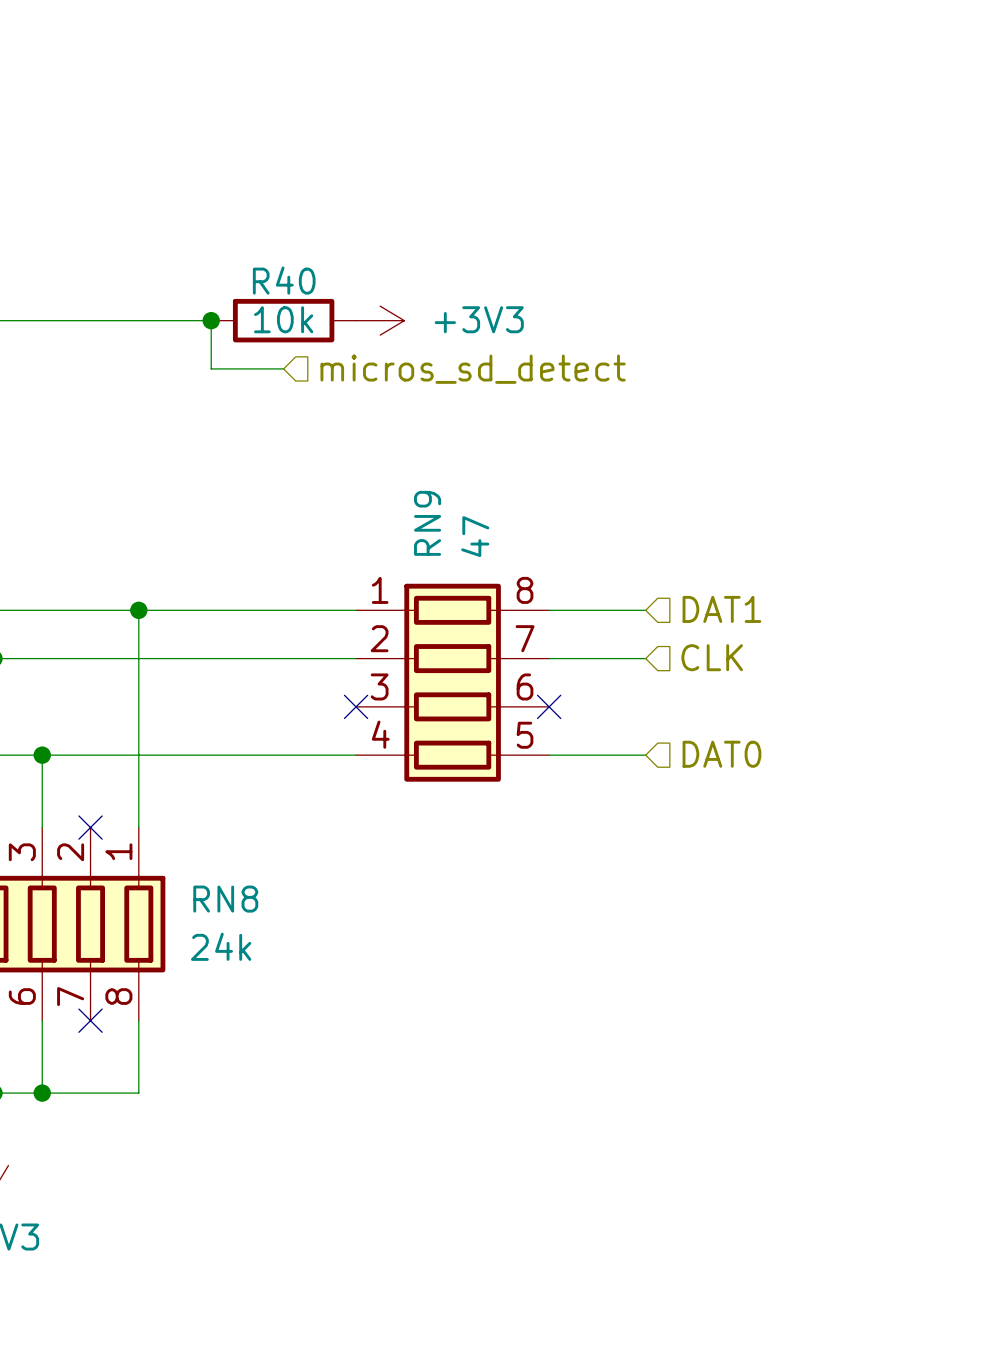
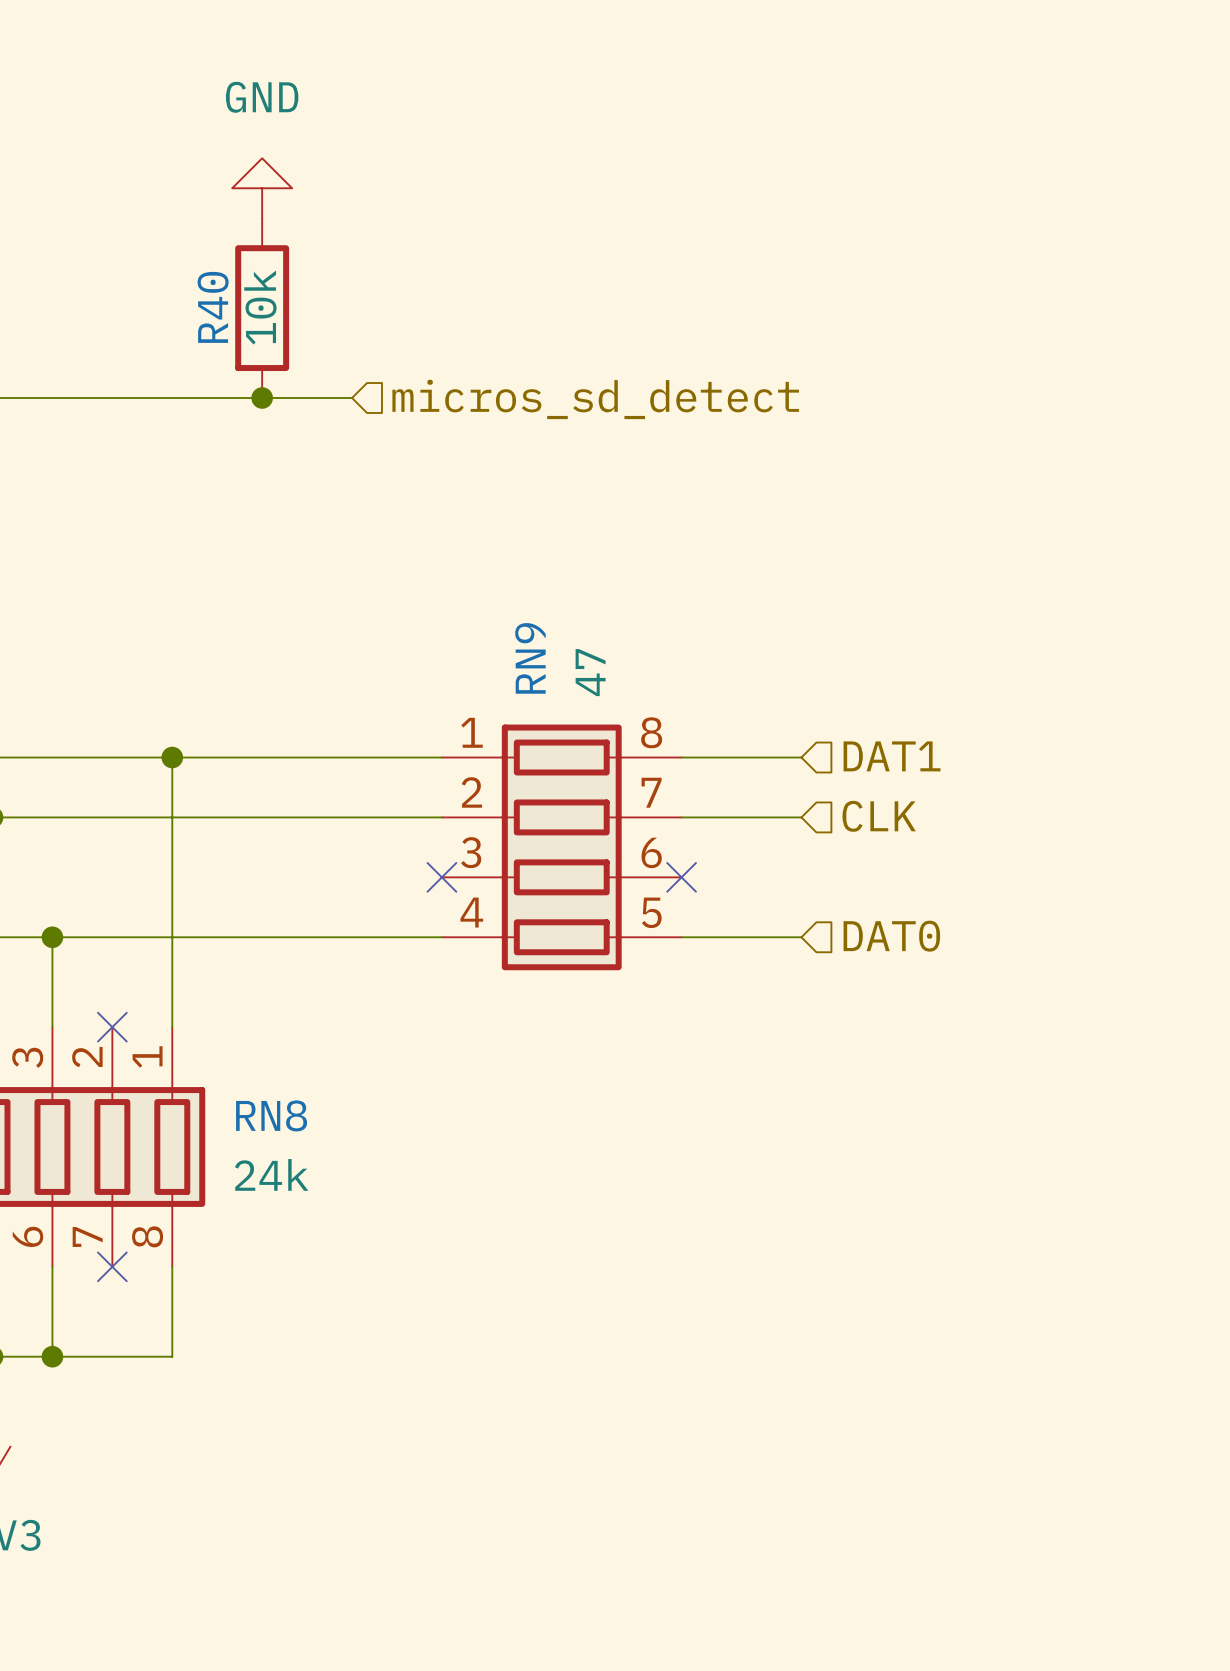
power symbol: none -> GND (262, 188)
R40 name position: R40 (284, 280) -> R40 (213, 307)
wire: (211, 320) (211, 368) (283, 368) -> (262, 397) (352, 397)
R40 rotation: 0° (283, 320) -> 90° clockwise (262, 308)
R40 position: (283, 320) -> (262, 308)
power symbol: +3V3 (380, 320) -> none
hierarchical label position: micros_sd_detect (473, 369) -> micros_sd_detect (595, 399)

